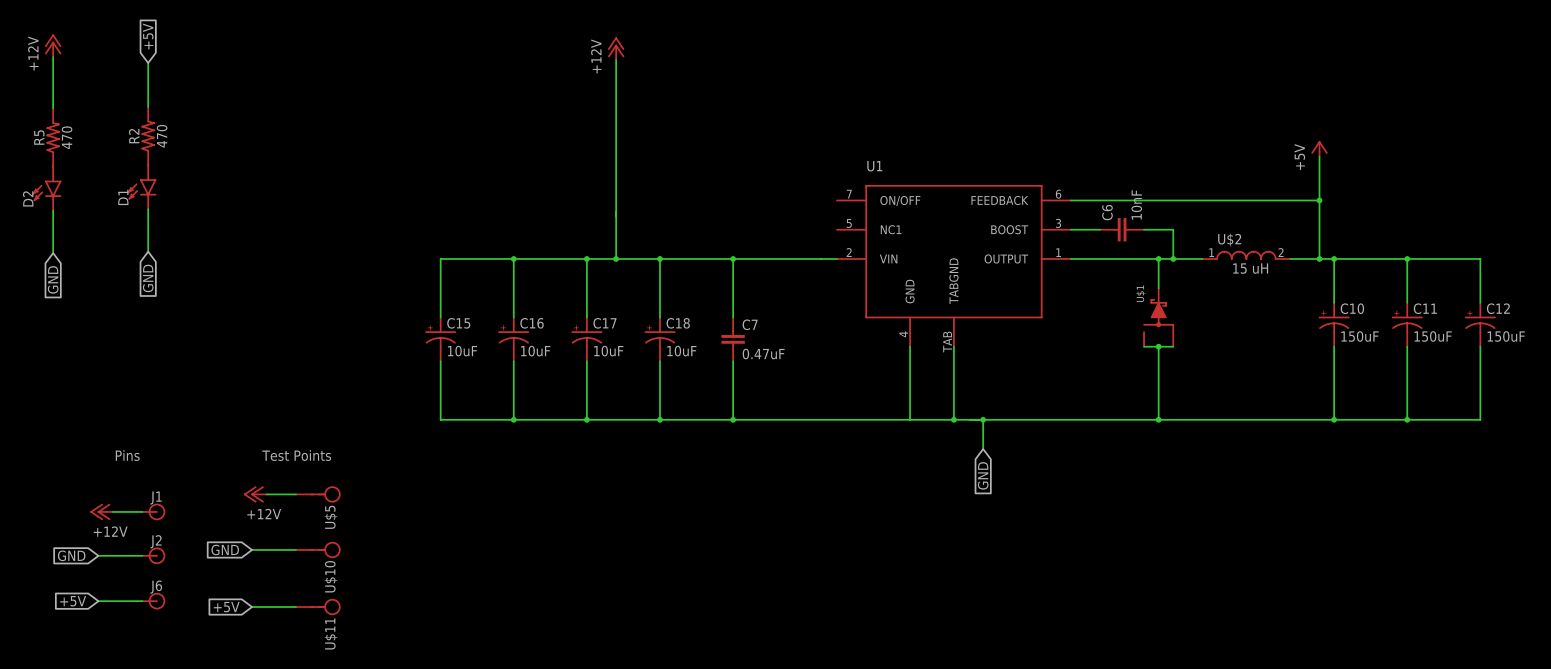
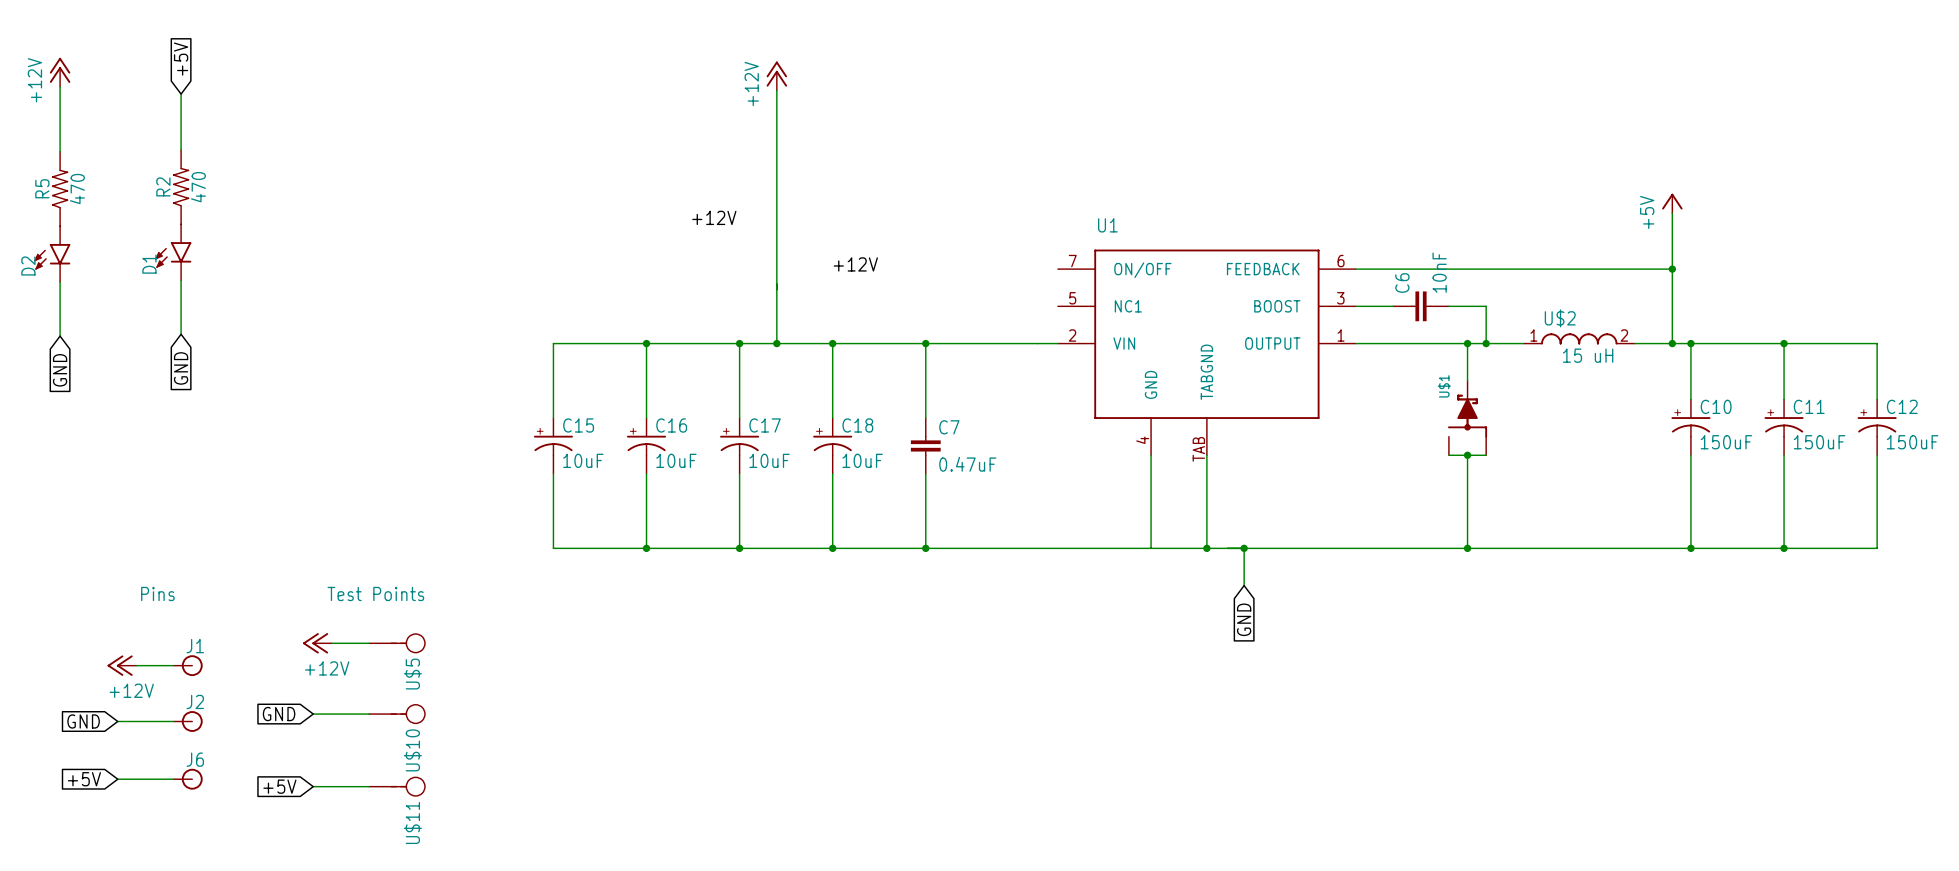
label: none -> +12V (714, 217)
label: none -> +12V (855, 264)

